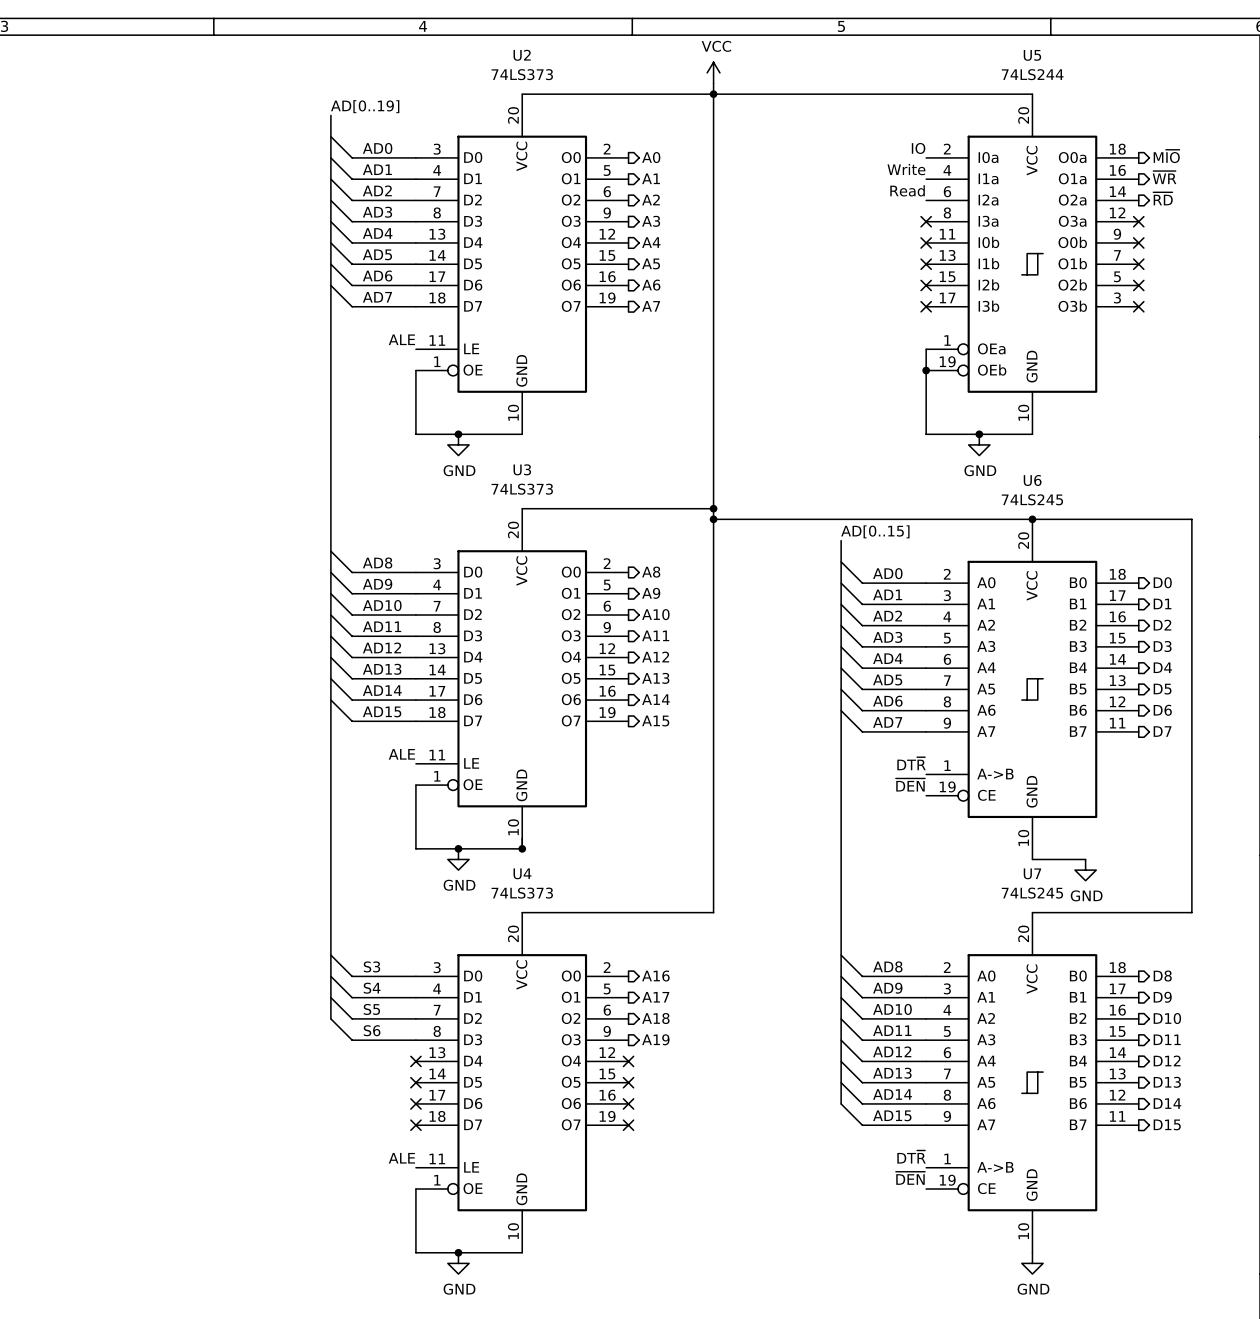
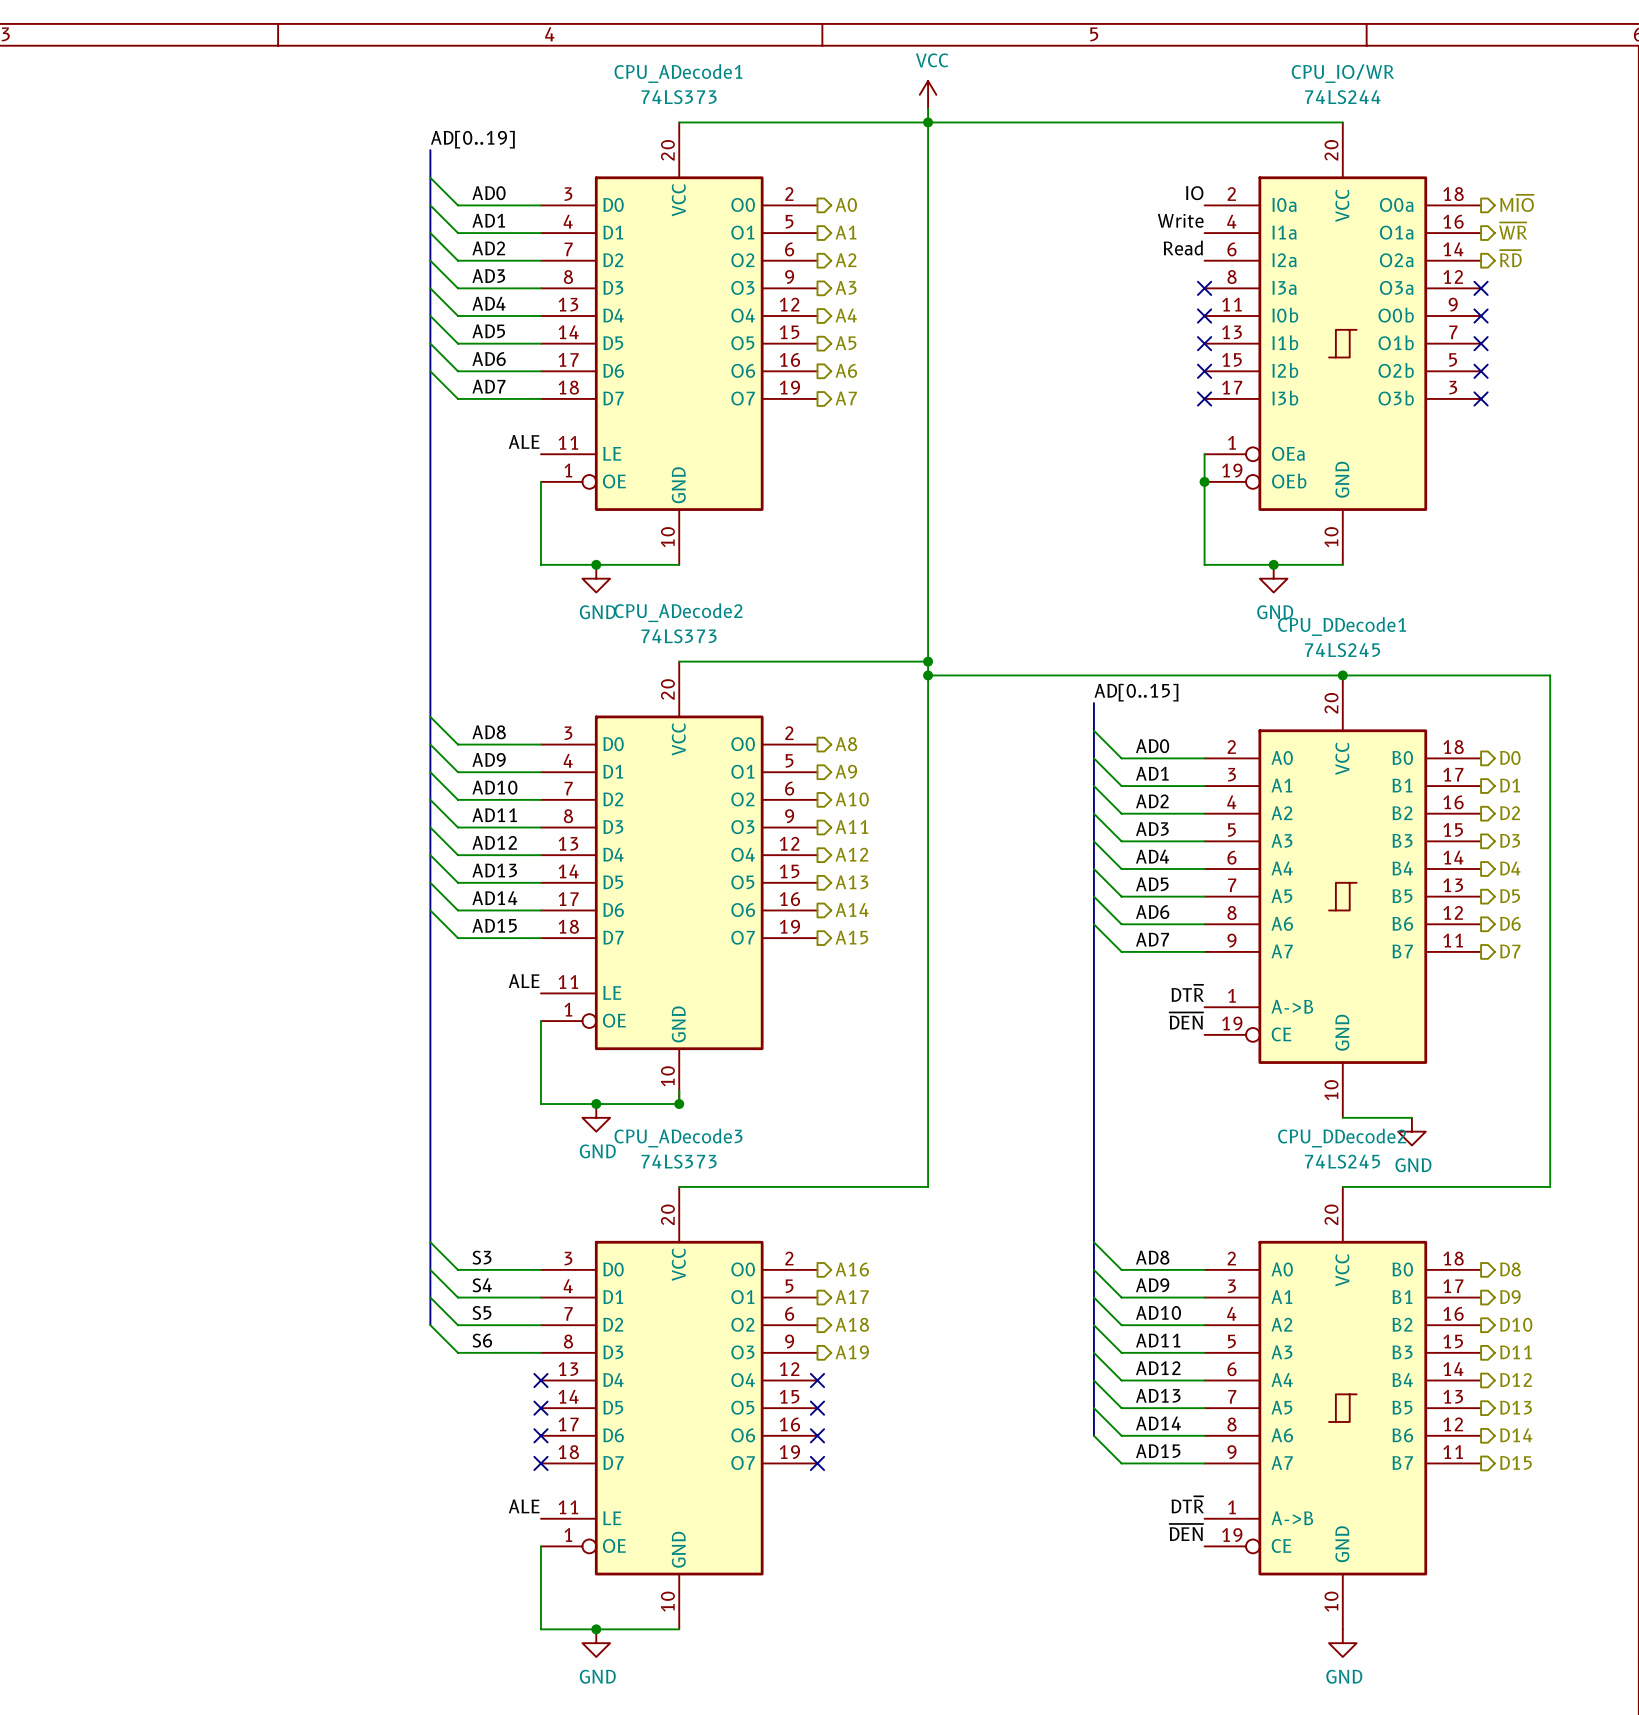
U2 name: U2 (522, 55) -> CPU_ADecode1 (678, 73)
U5 name: U5 (1032, 55) -> CPU_IO/WR (1342, 73)
U3 name: U3 (522, 469) -> CPU_ADecode2 (678, 612)
U6 name: U6 (1032, 480) -> CPU_DDecode1 (1342, 626)
U4 name: U4 (522, 873) -> CPU_ADecode3 (678, 1138)
U7 name: U7 (1032, 873) -> CPU_DDecode2 (1342, 1138)

